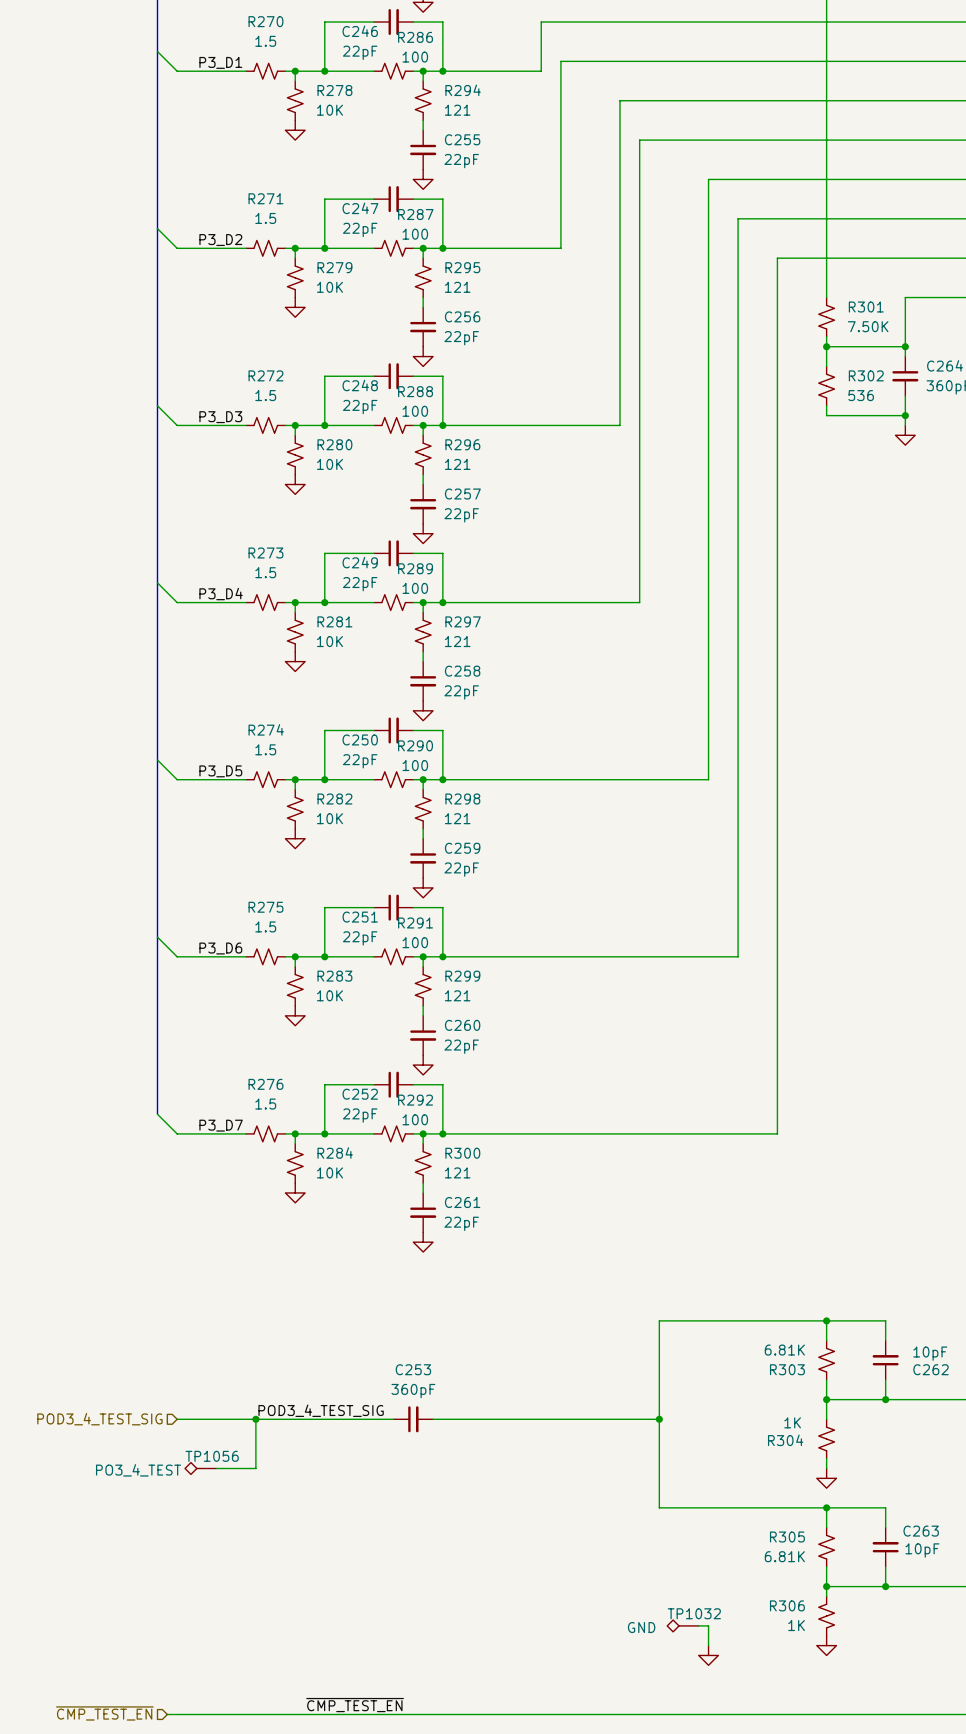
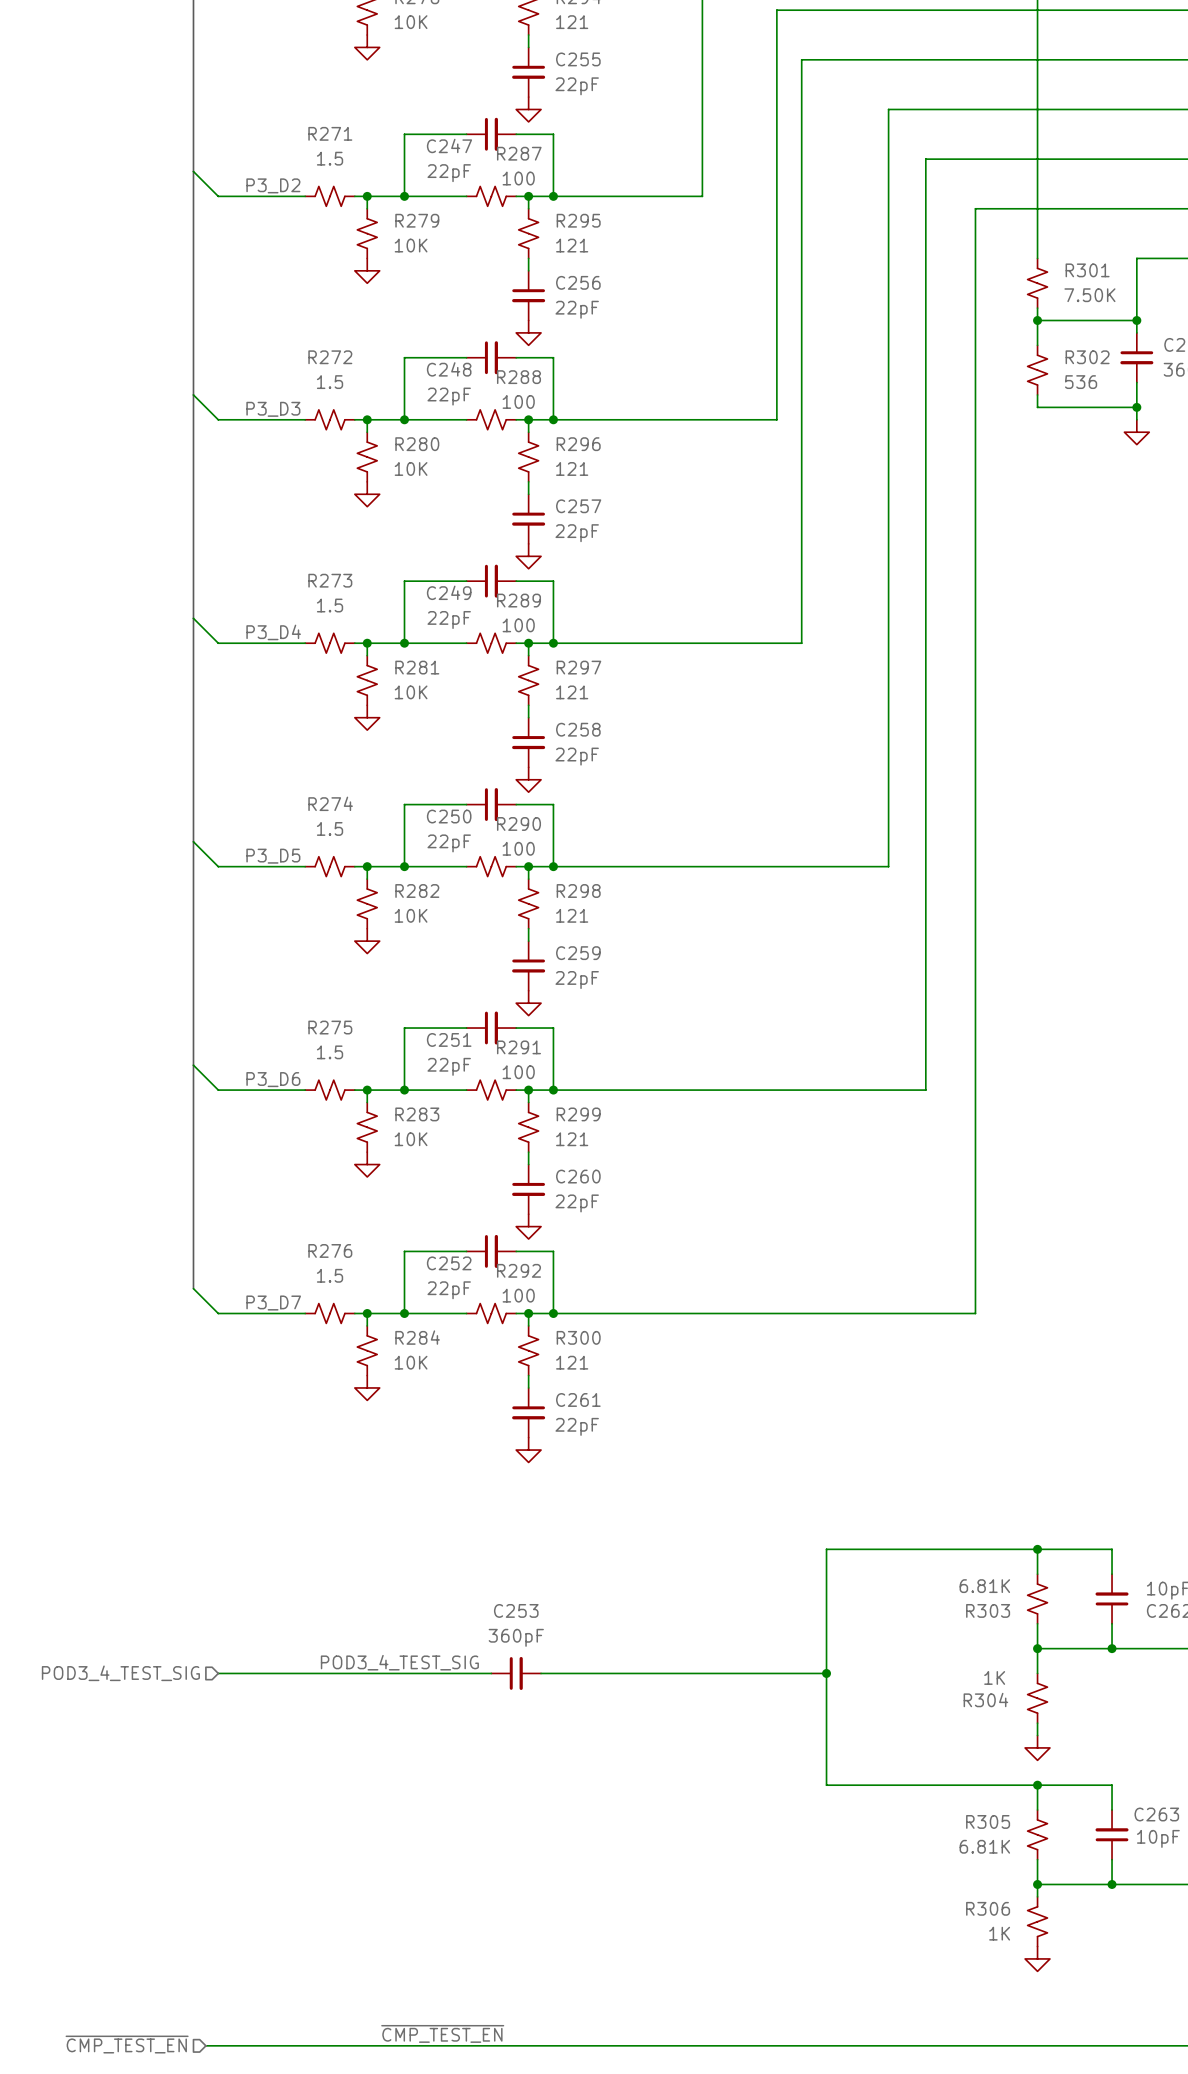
wire: (255, 1419) (255, 1468) (216, 1468) -> none
junction: (255, 1419) -> none
TP1056: PO3_4_TEST (200, 1468) -> none
TP1032: GND (682, 1625) -> none
wire: (698, 1625) (708, 1625) (708, 1645) -> none
power symbol: (708, 1655) -> none

